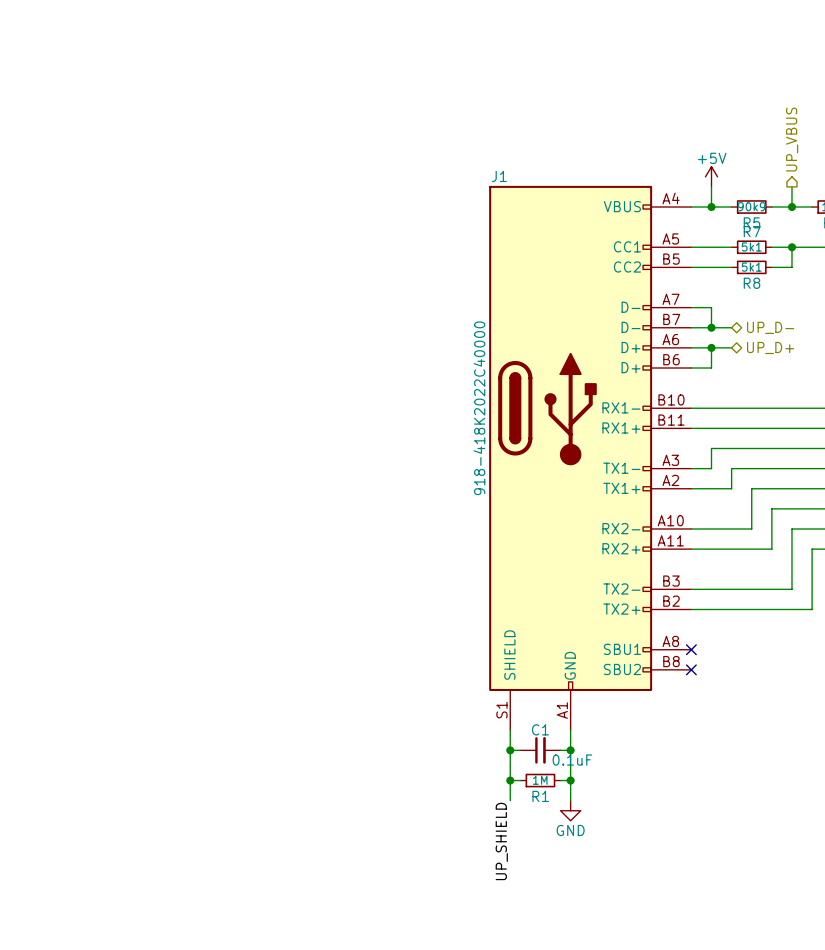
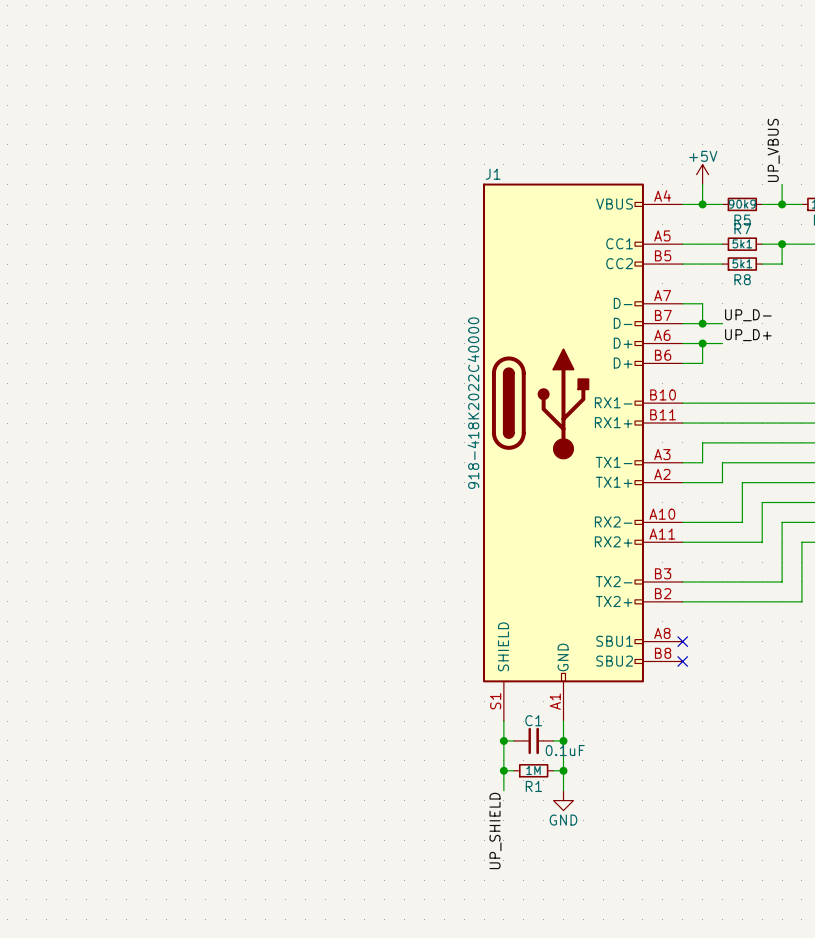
hierarchical label: UP_VBUS (792, 139) -> none
label: none -> UP_VBUS (773, 150)
label: none -> UP_D- (748, 315)
hierarchical label: UP_D- (770, 327) -> none
label: none -> UP_D+ (748, 335)
hierarchical label: UP_D+ (770, 347) -> none

